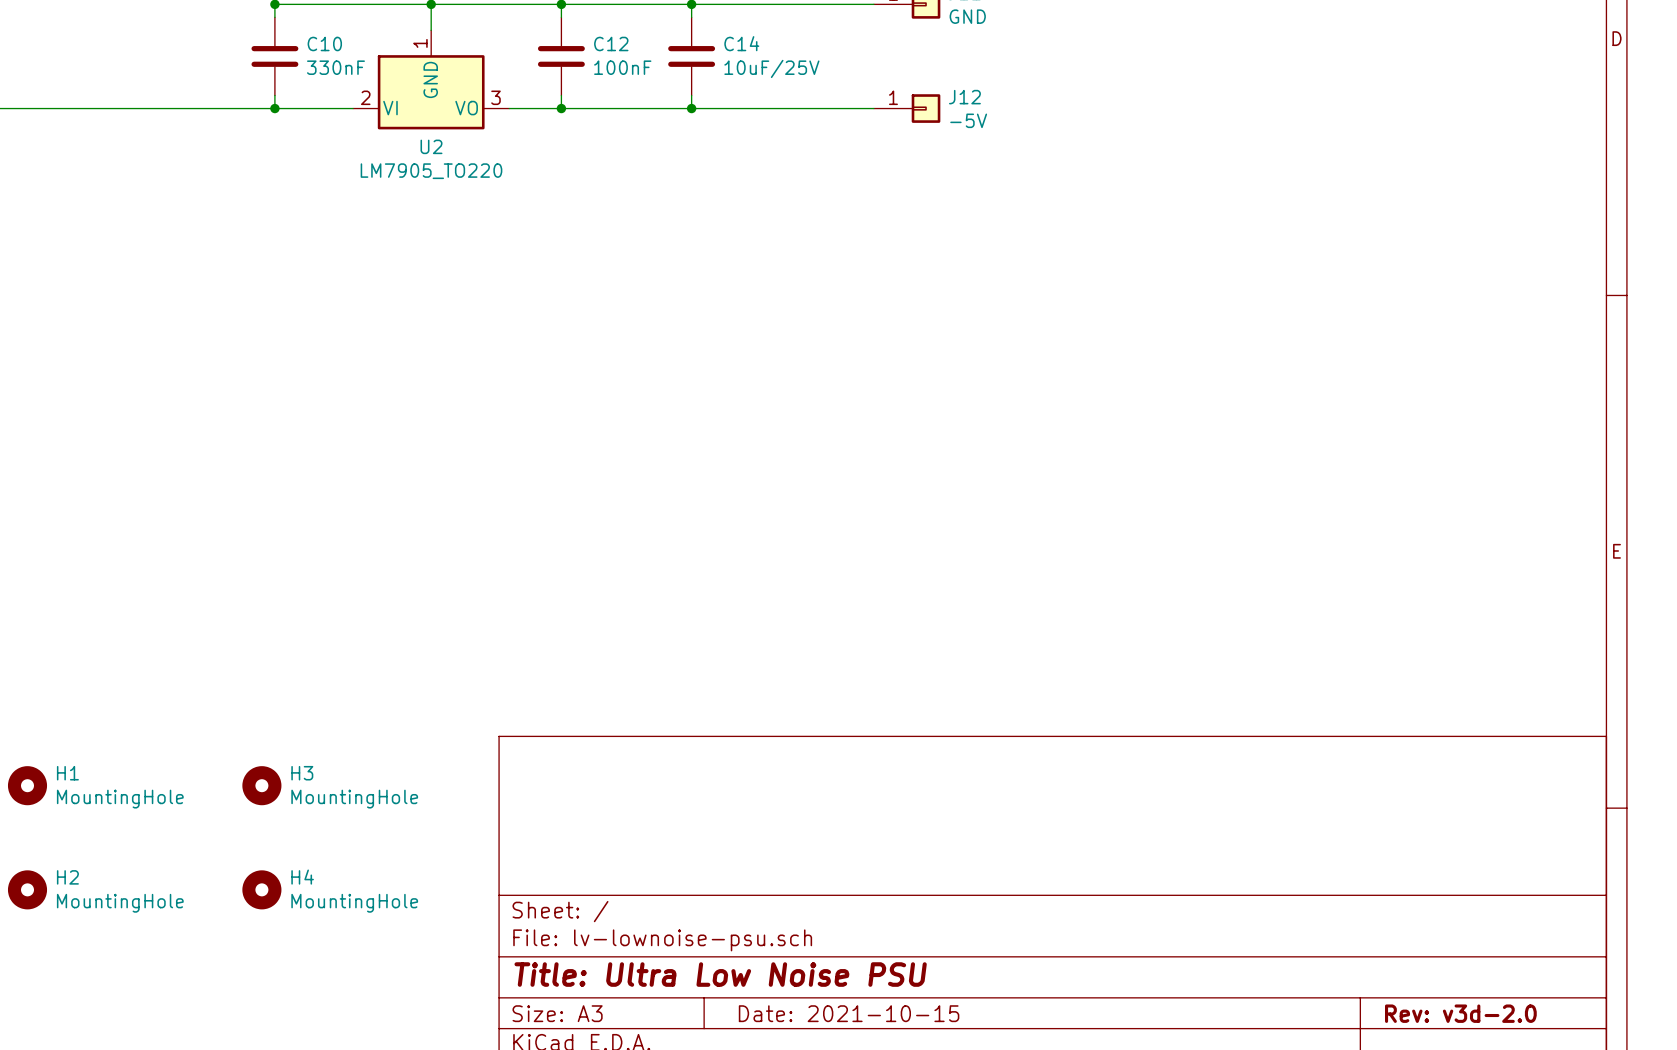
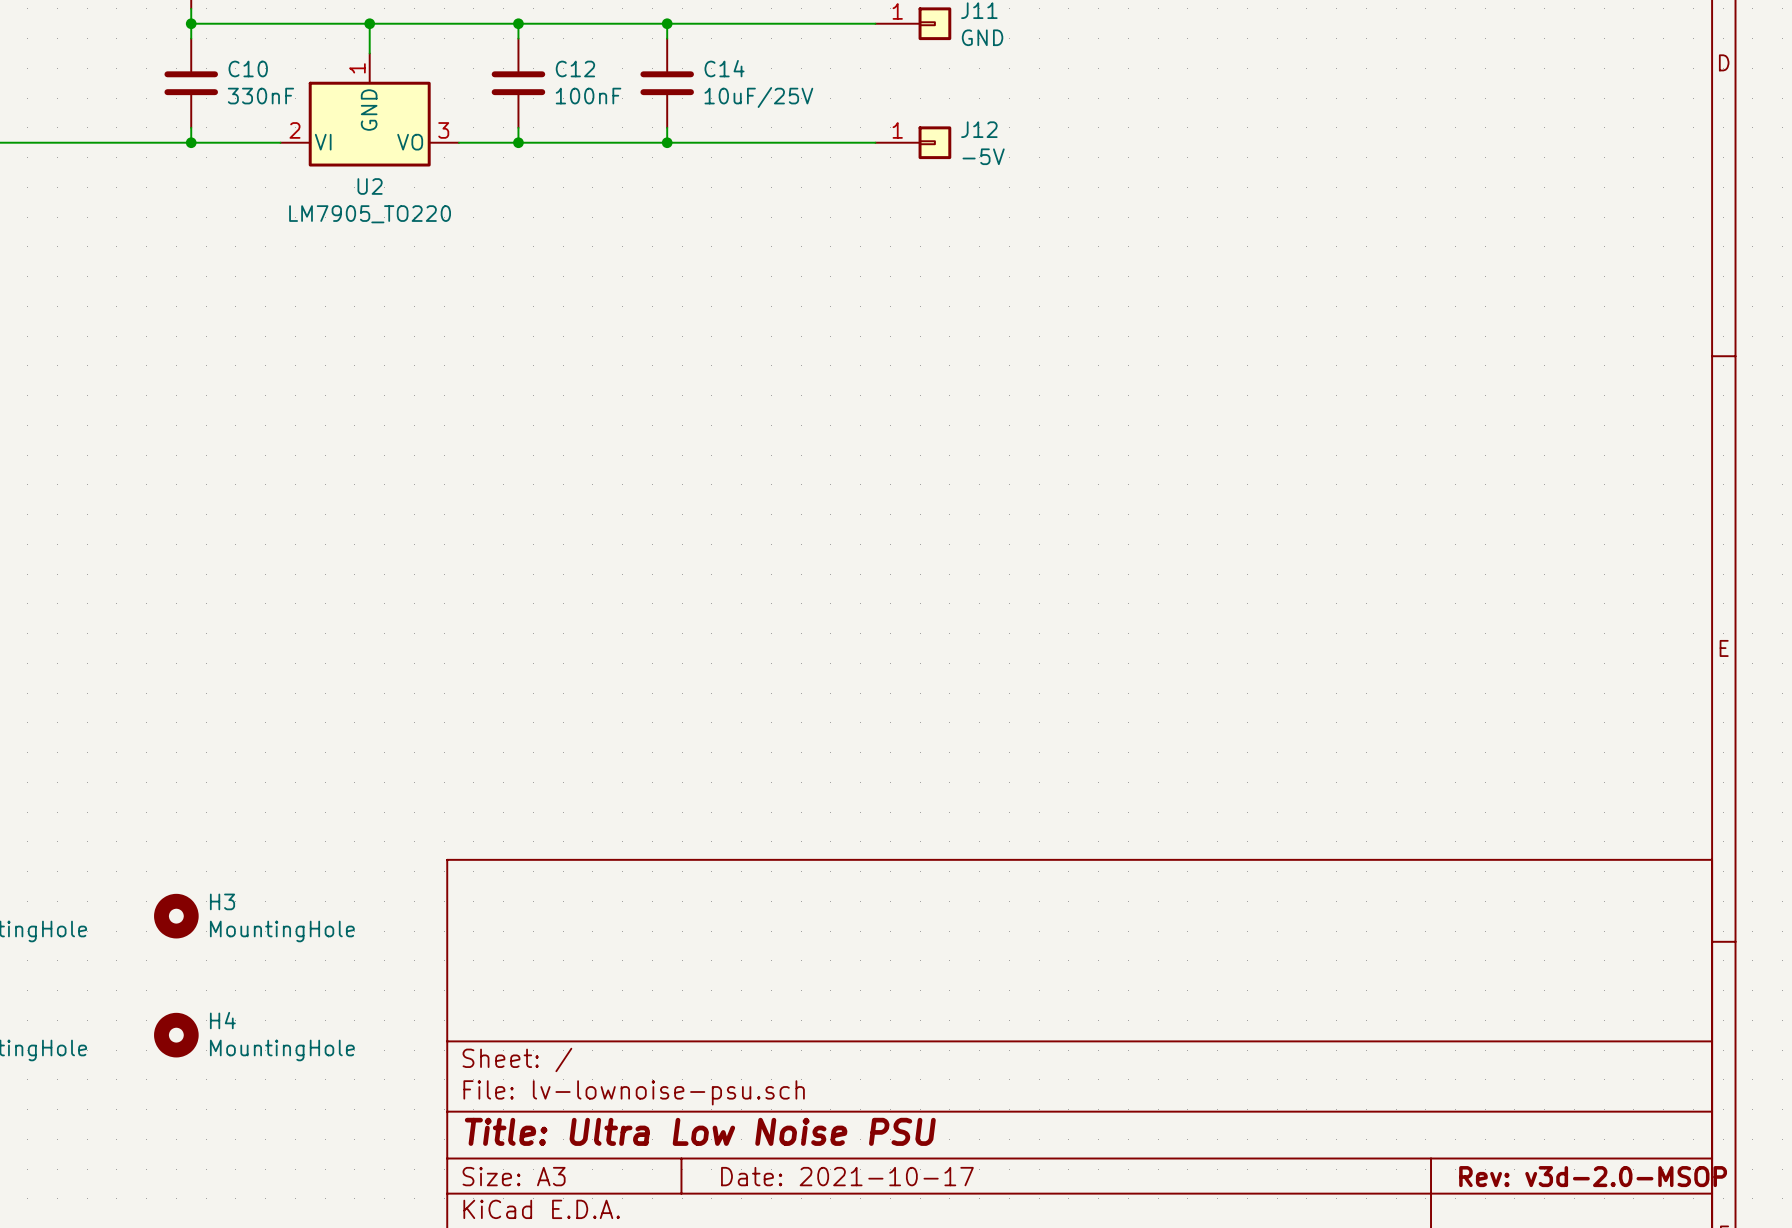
title block: Date: 2021-10-15 (849, 1013) -> Date: 2021-10-17 (847, 1176)
title block: Rev: v3d-2.0 (1460, 1013) -> Rev: v3d-2.0-MSOP (1593, 1176)

